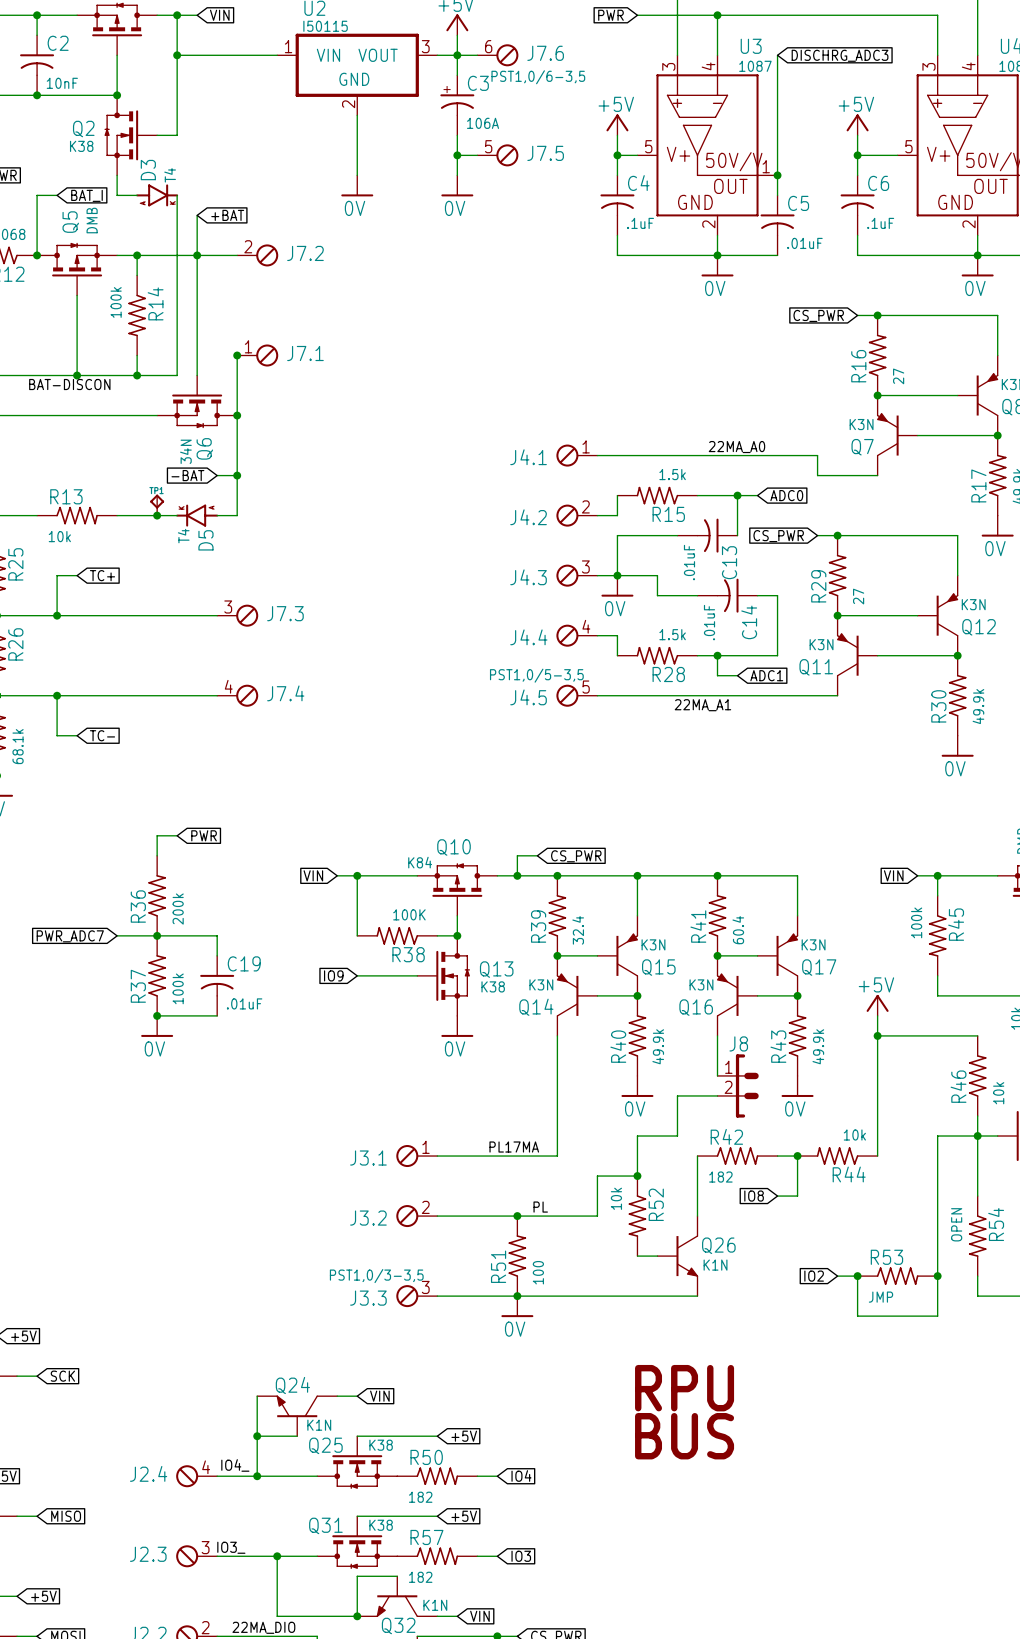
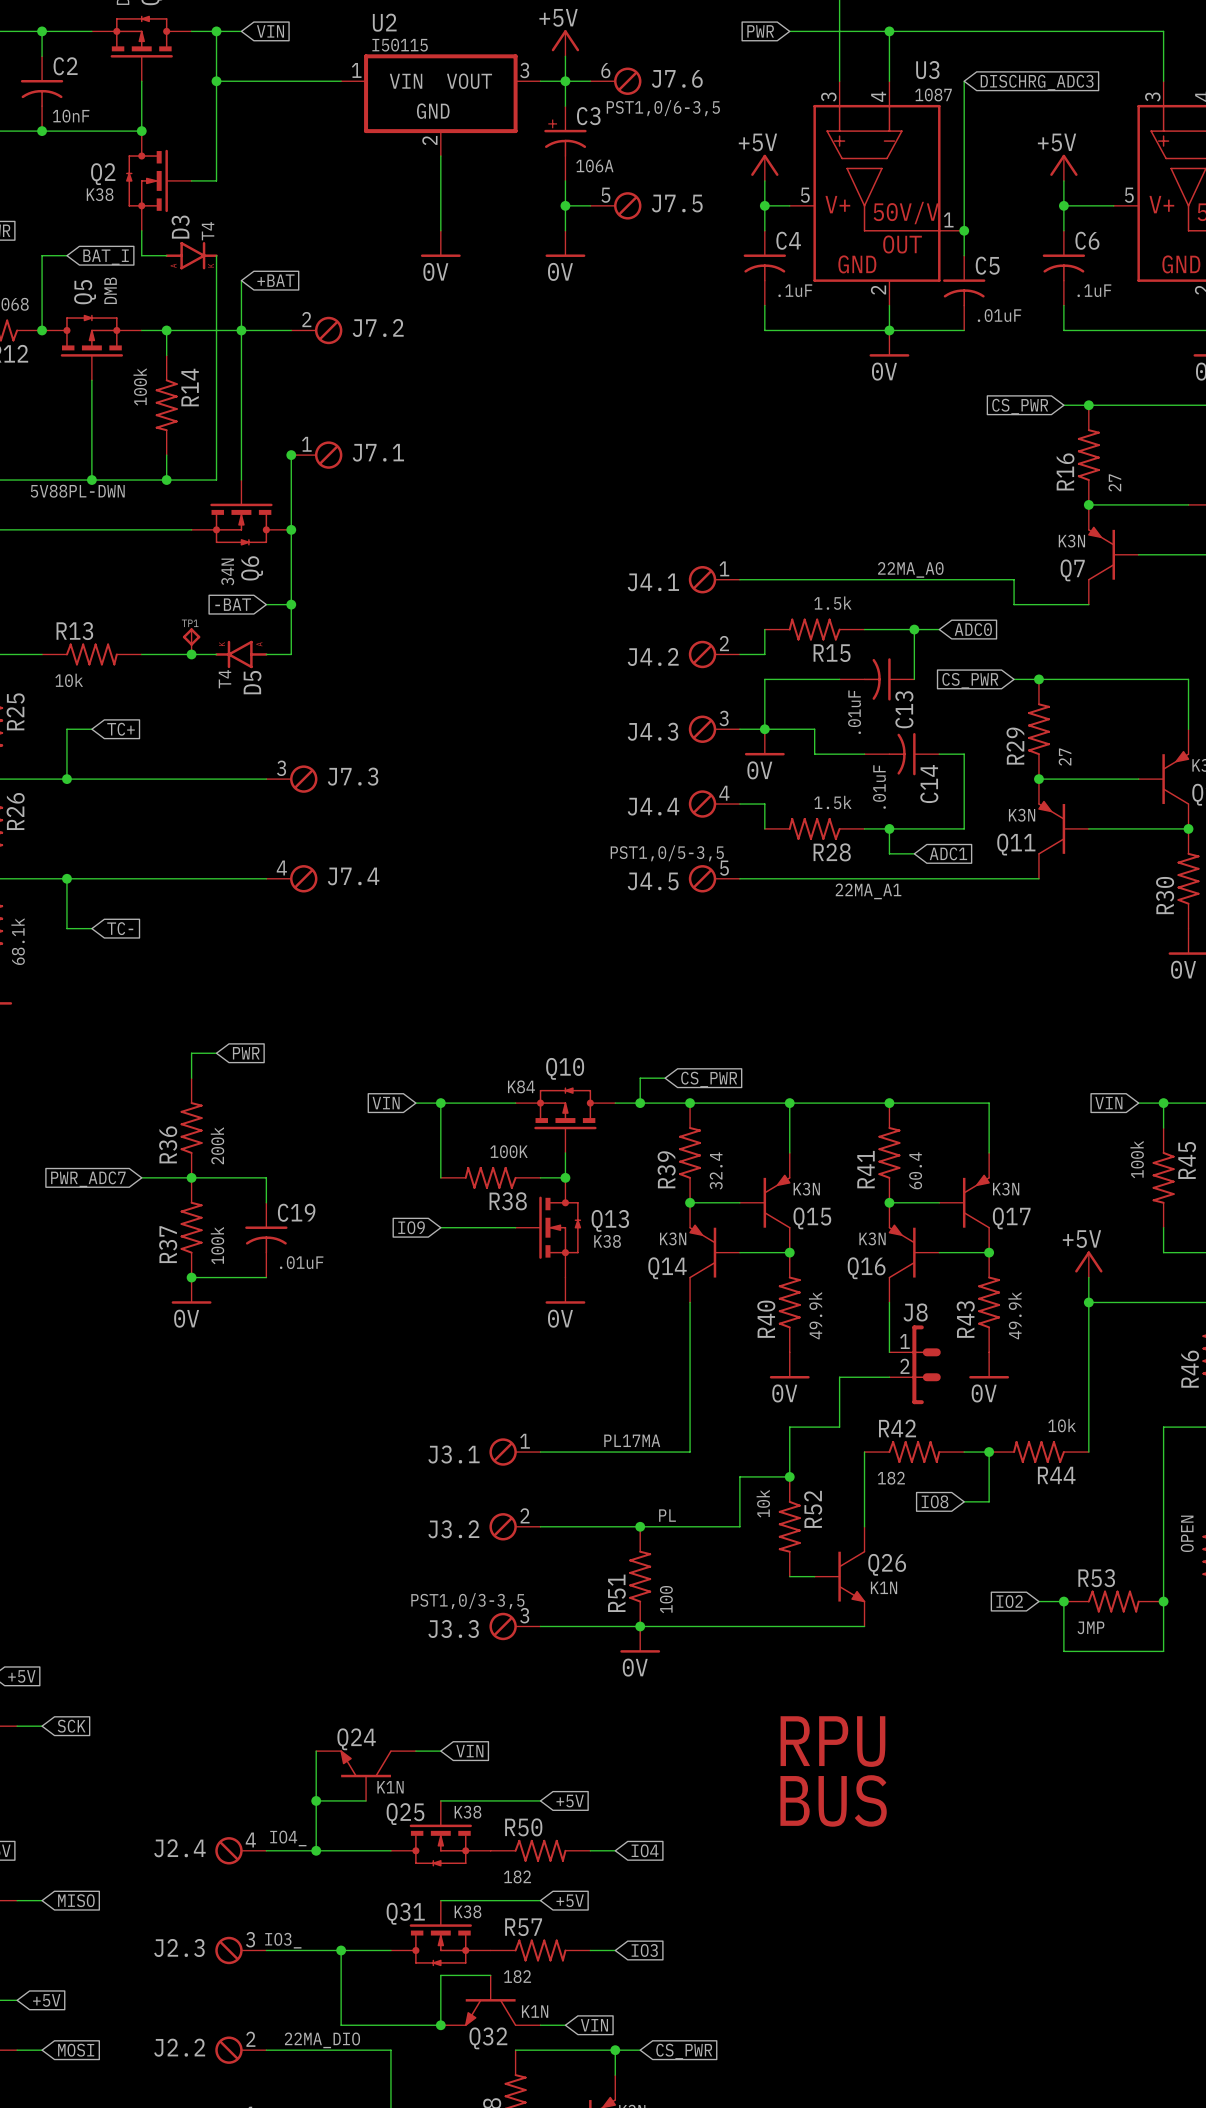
label: BAT-DISCON (69, 384) -> 5V88PL-DWN (77, 491)

